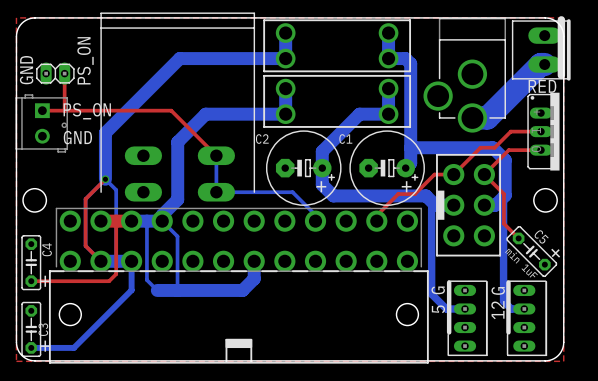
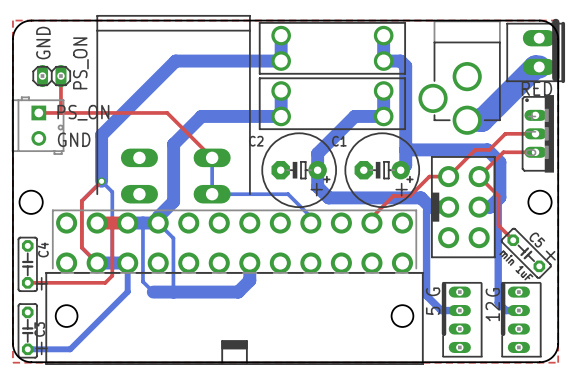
text position: GND (26, 70) -> GND (43, 43)

